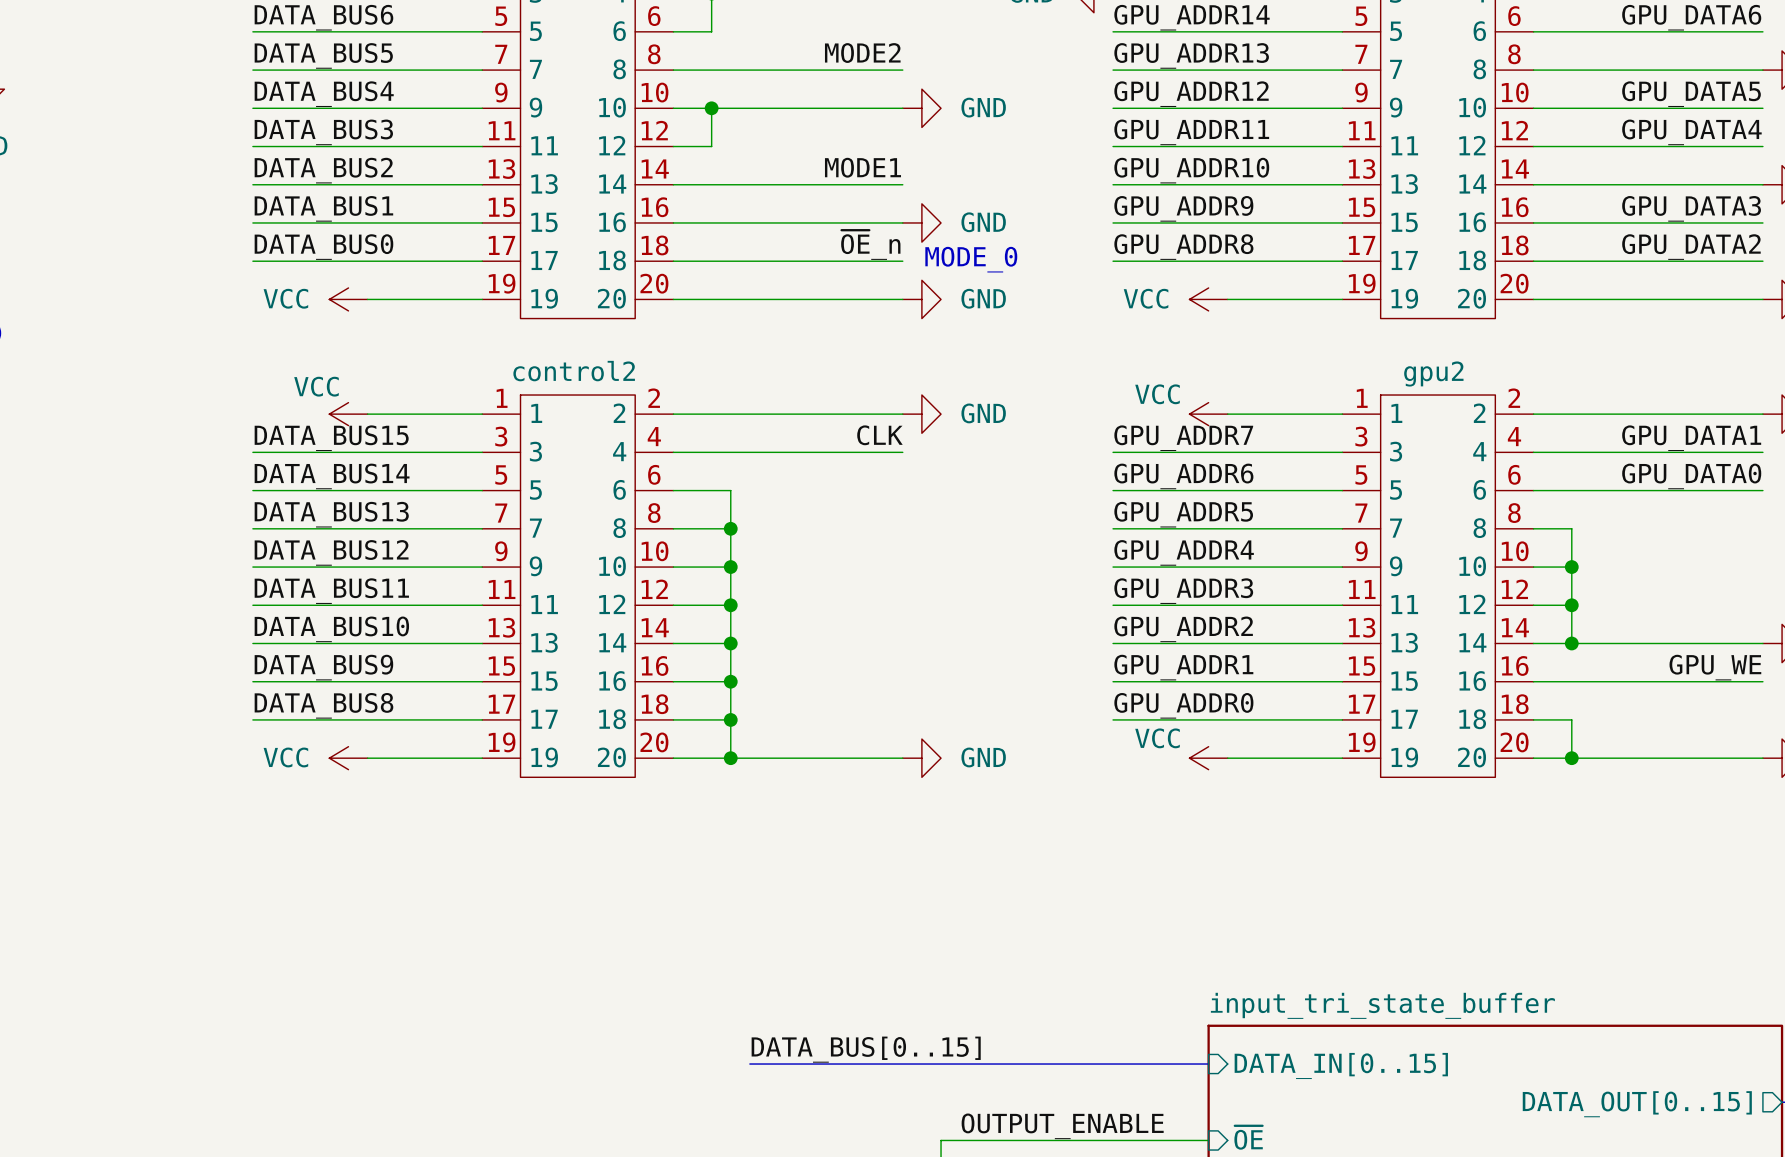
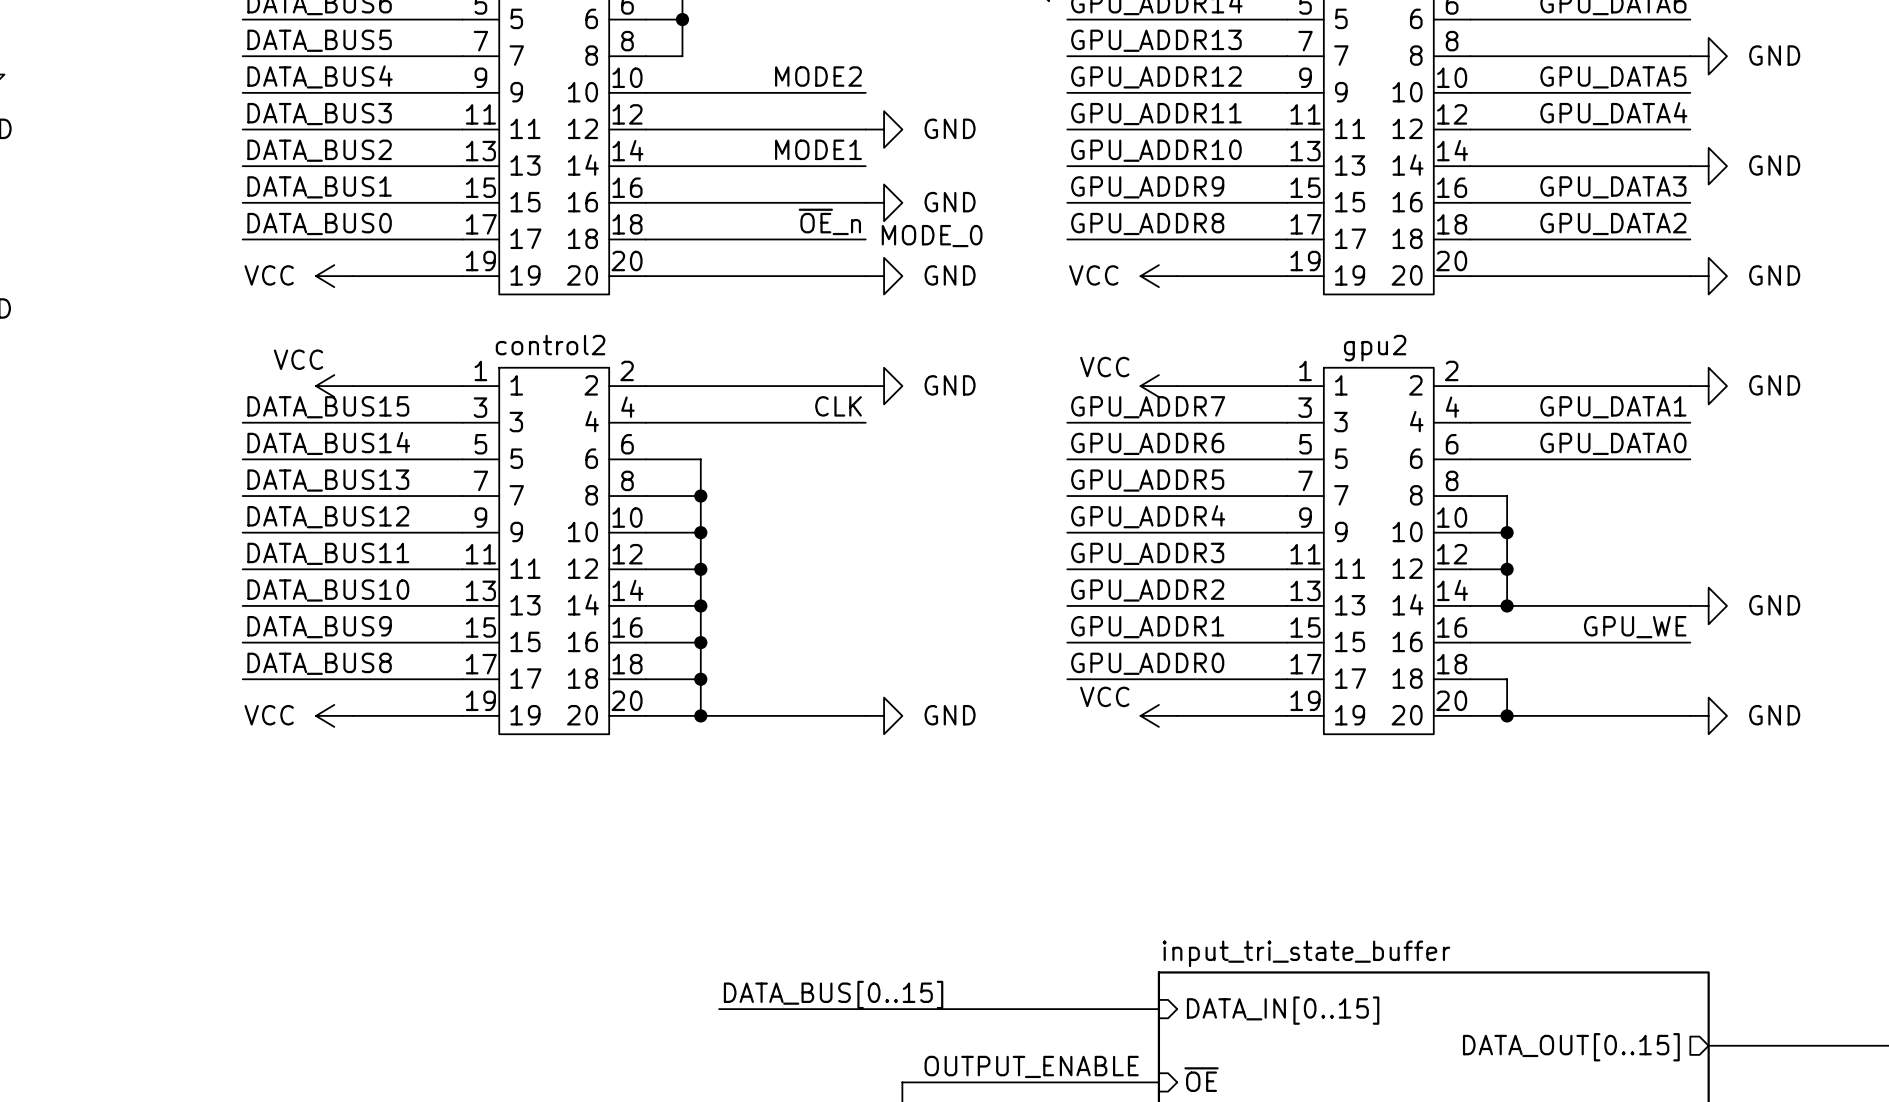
label position: MODE2 (862, 53) -> MODE2 (818, 76)
wire: (711, 70) (902, 70) -> (682, 56) (682, 19)
wire: (711, 108) (711, 146) -> (865, 129) (682, 129)
junction position: (711, 108) -> (682, 19)
power symbol position: GND (921, 108) -> GND (884, 129)

